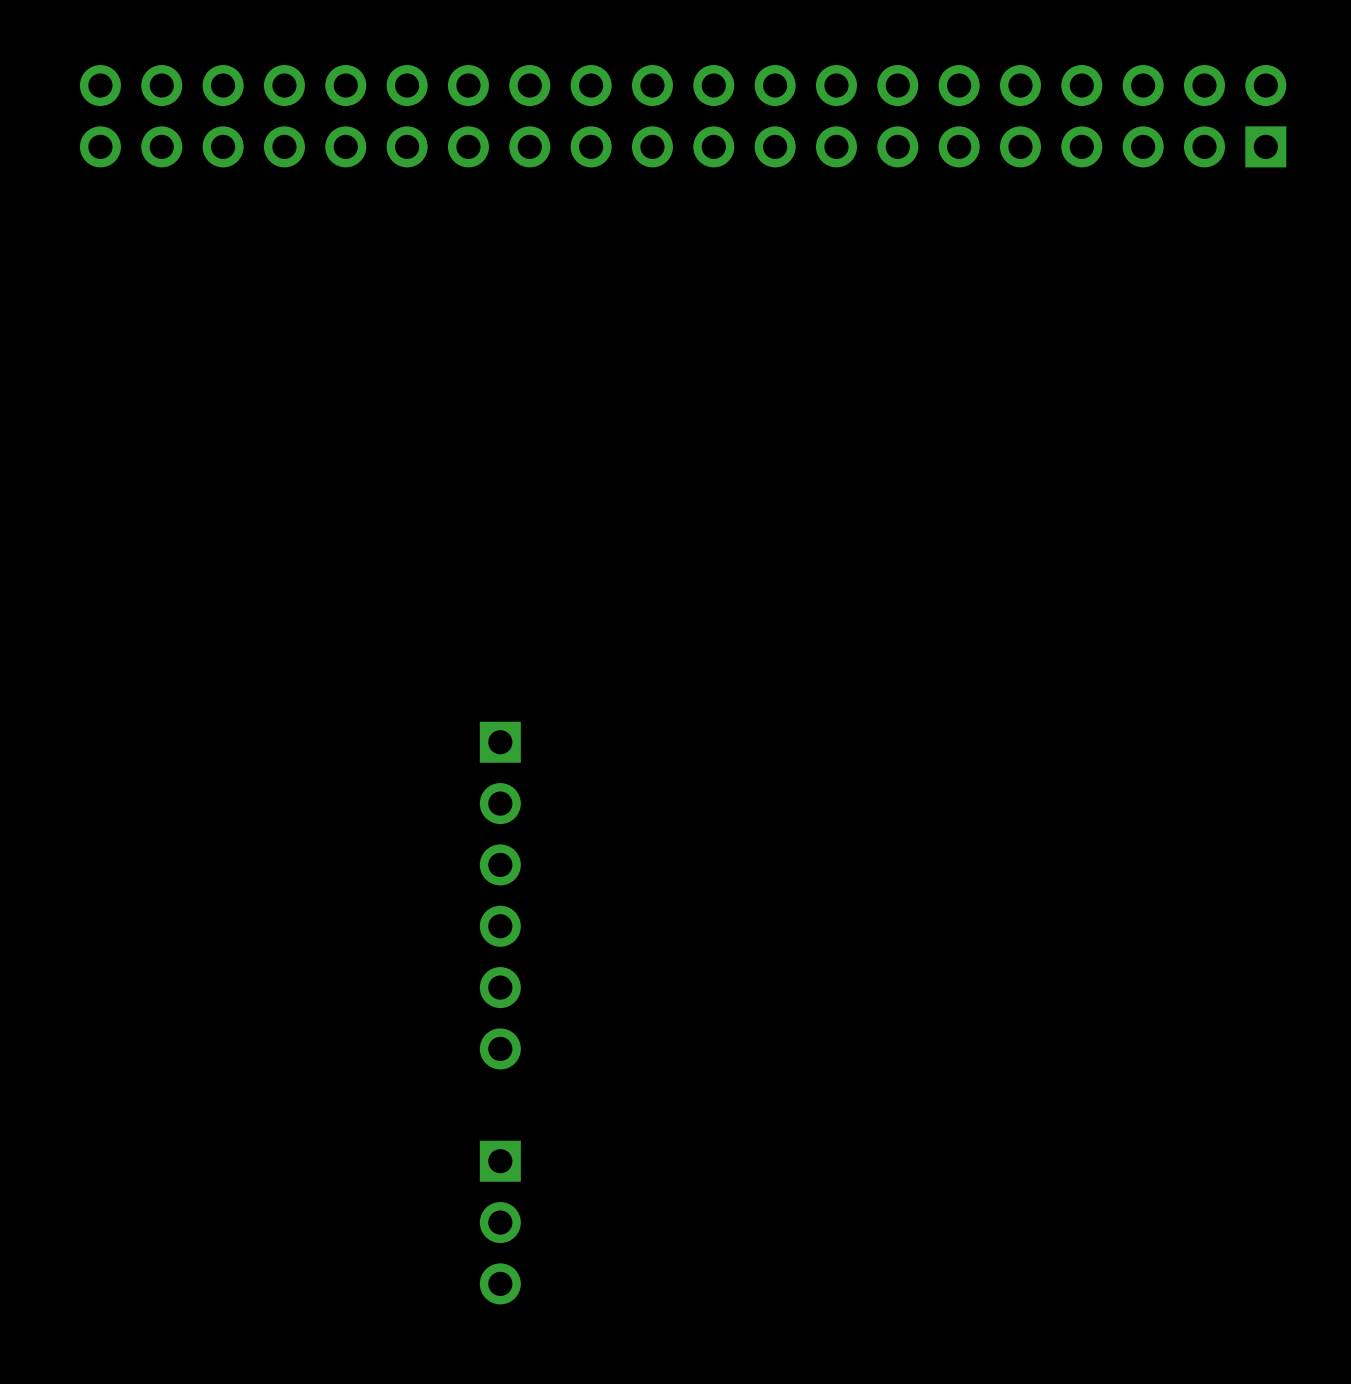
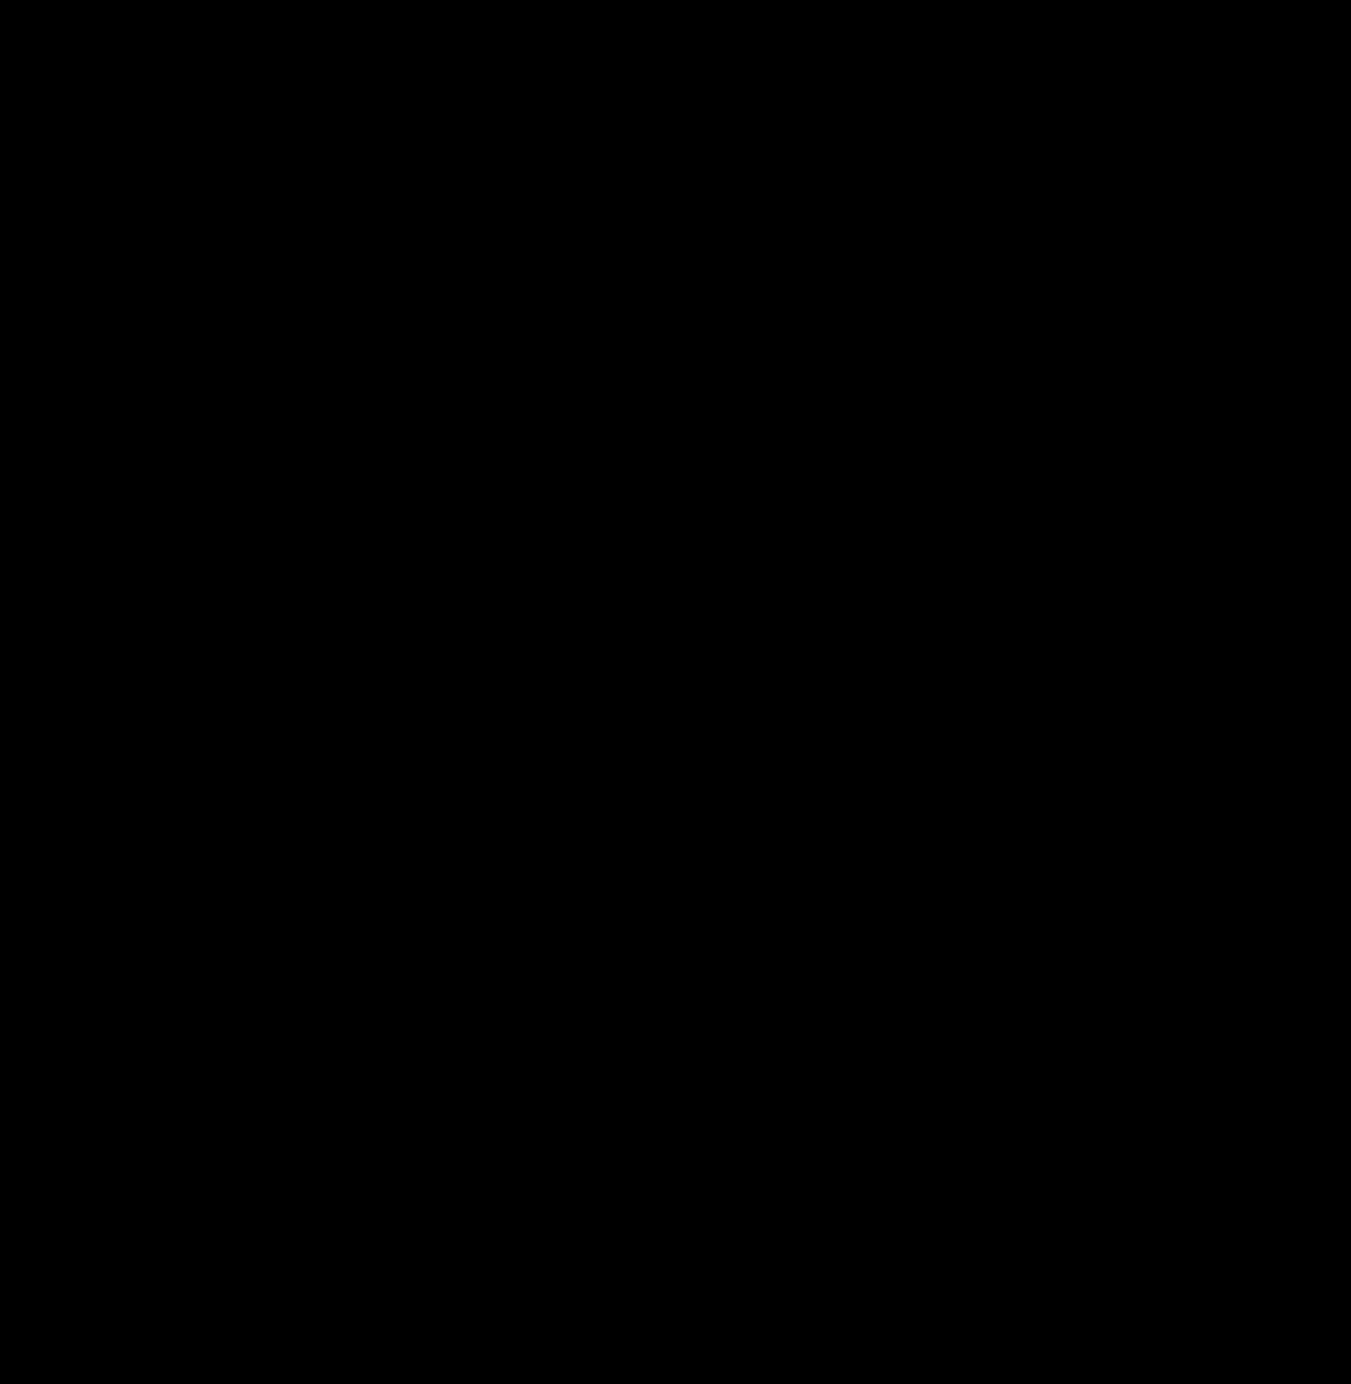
part: (683, 116) -> none
part: (500, 895) -> none
part: (500, 1222) -> none

